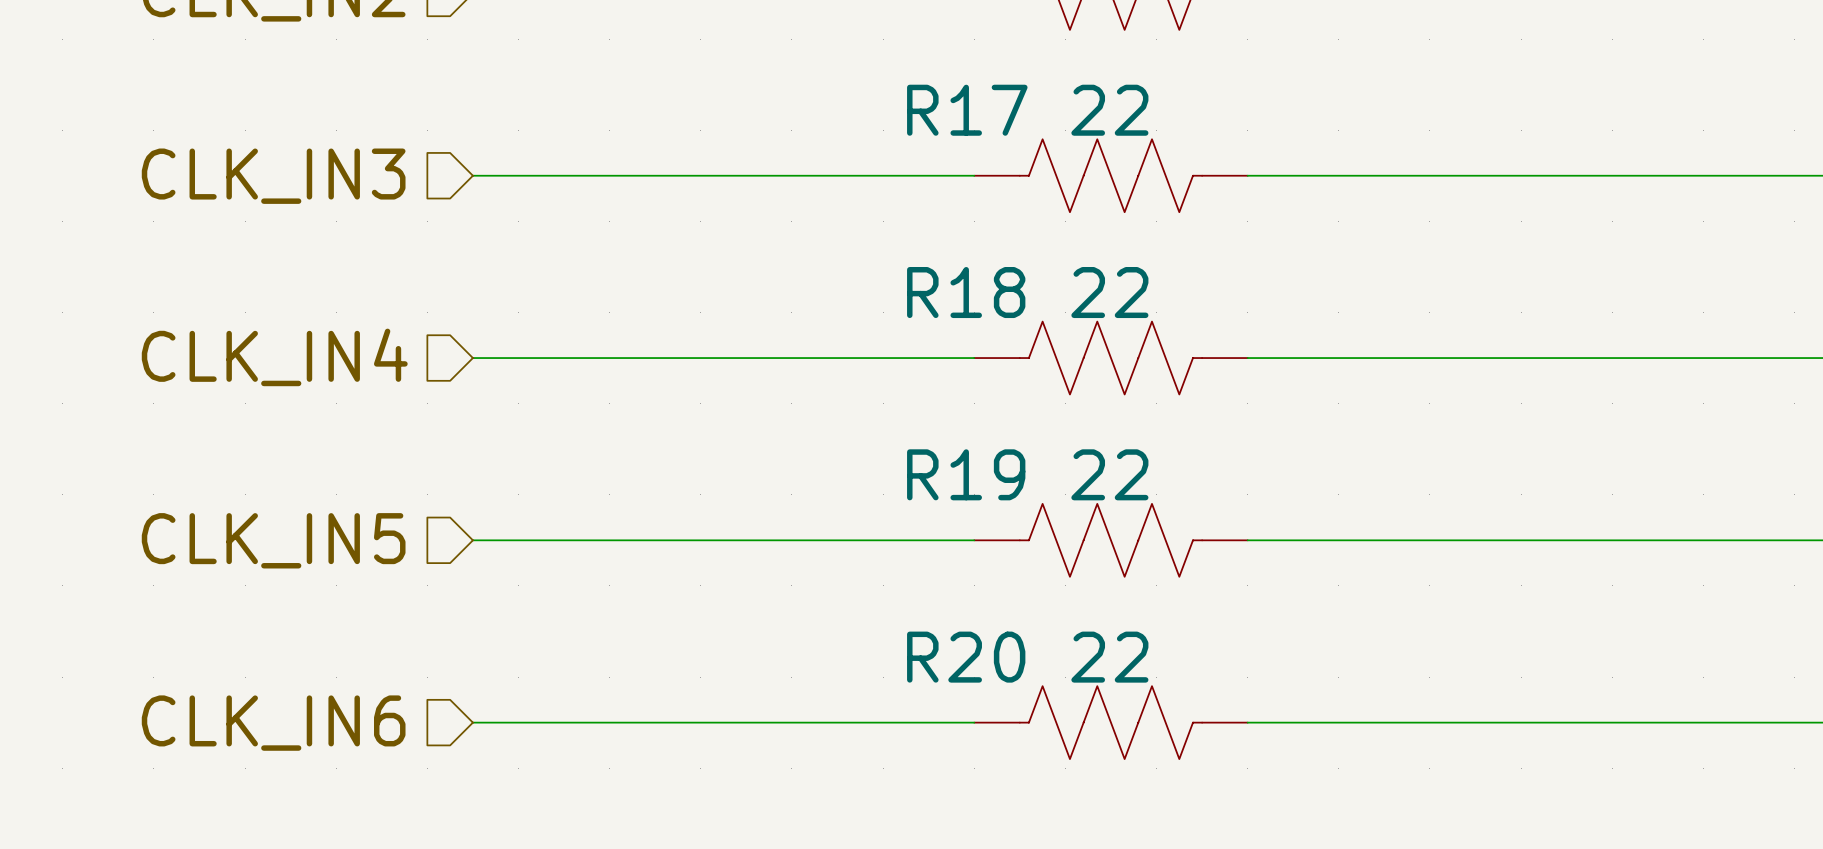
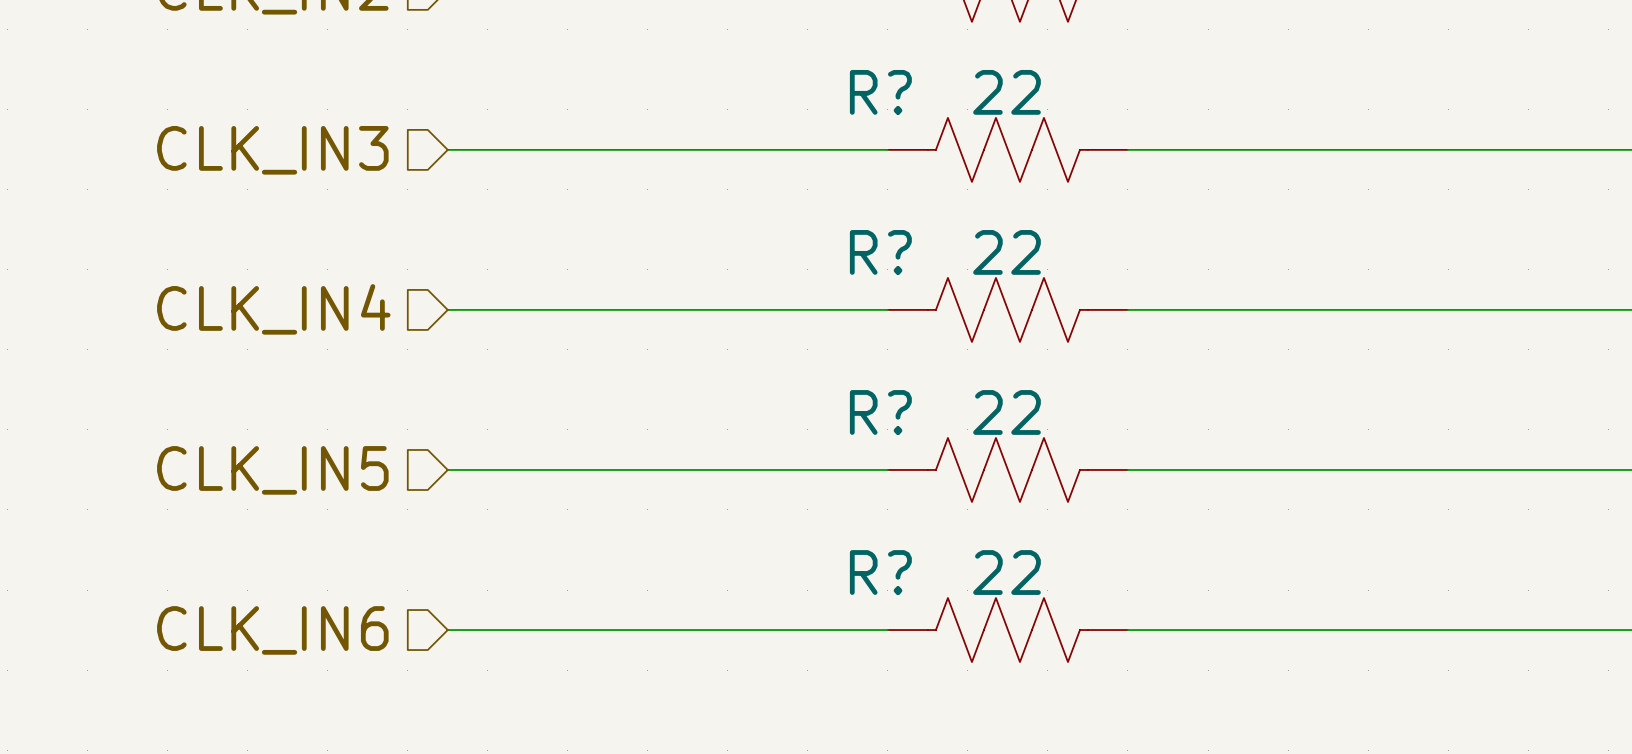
R17 name: R17 (967, 110) -> R? (880, 92)
R18 name: R18 (966, 292) -> R? (880, 252)
R19 name: R19 (966, 474) -> R? (880, 412)
R20 name: R20 (966, 657) -> R? (880, 572)

